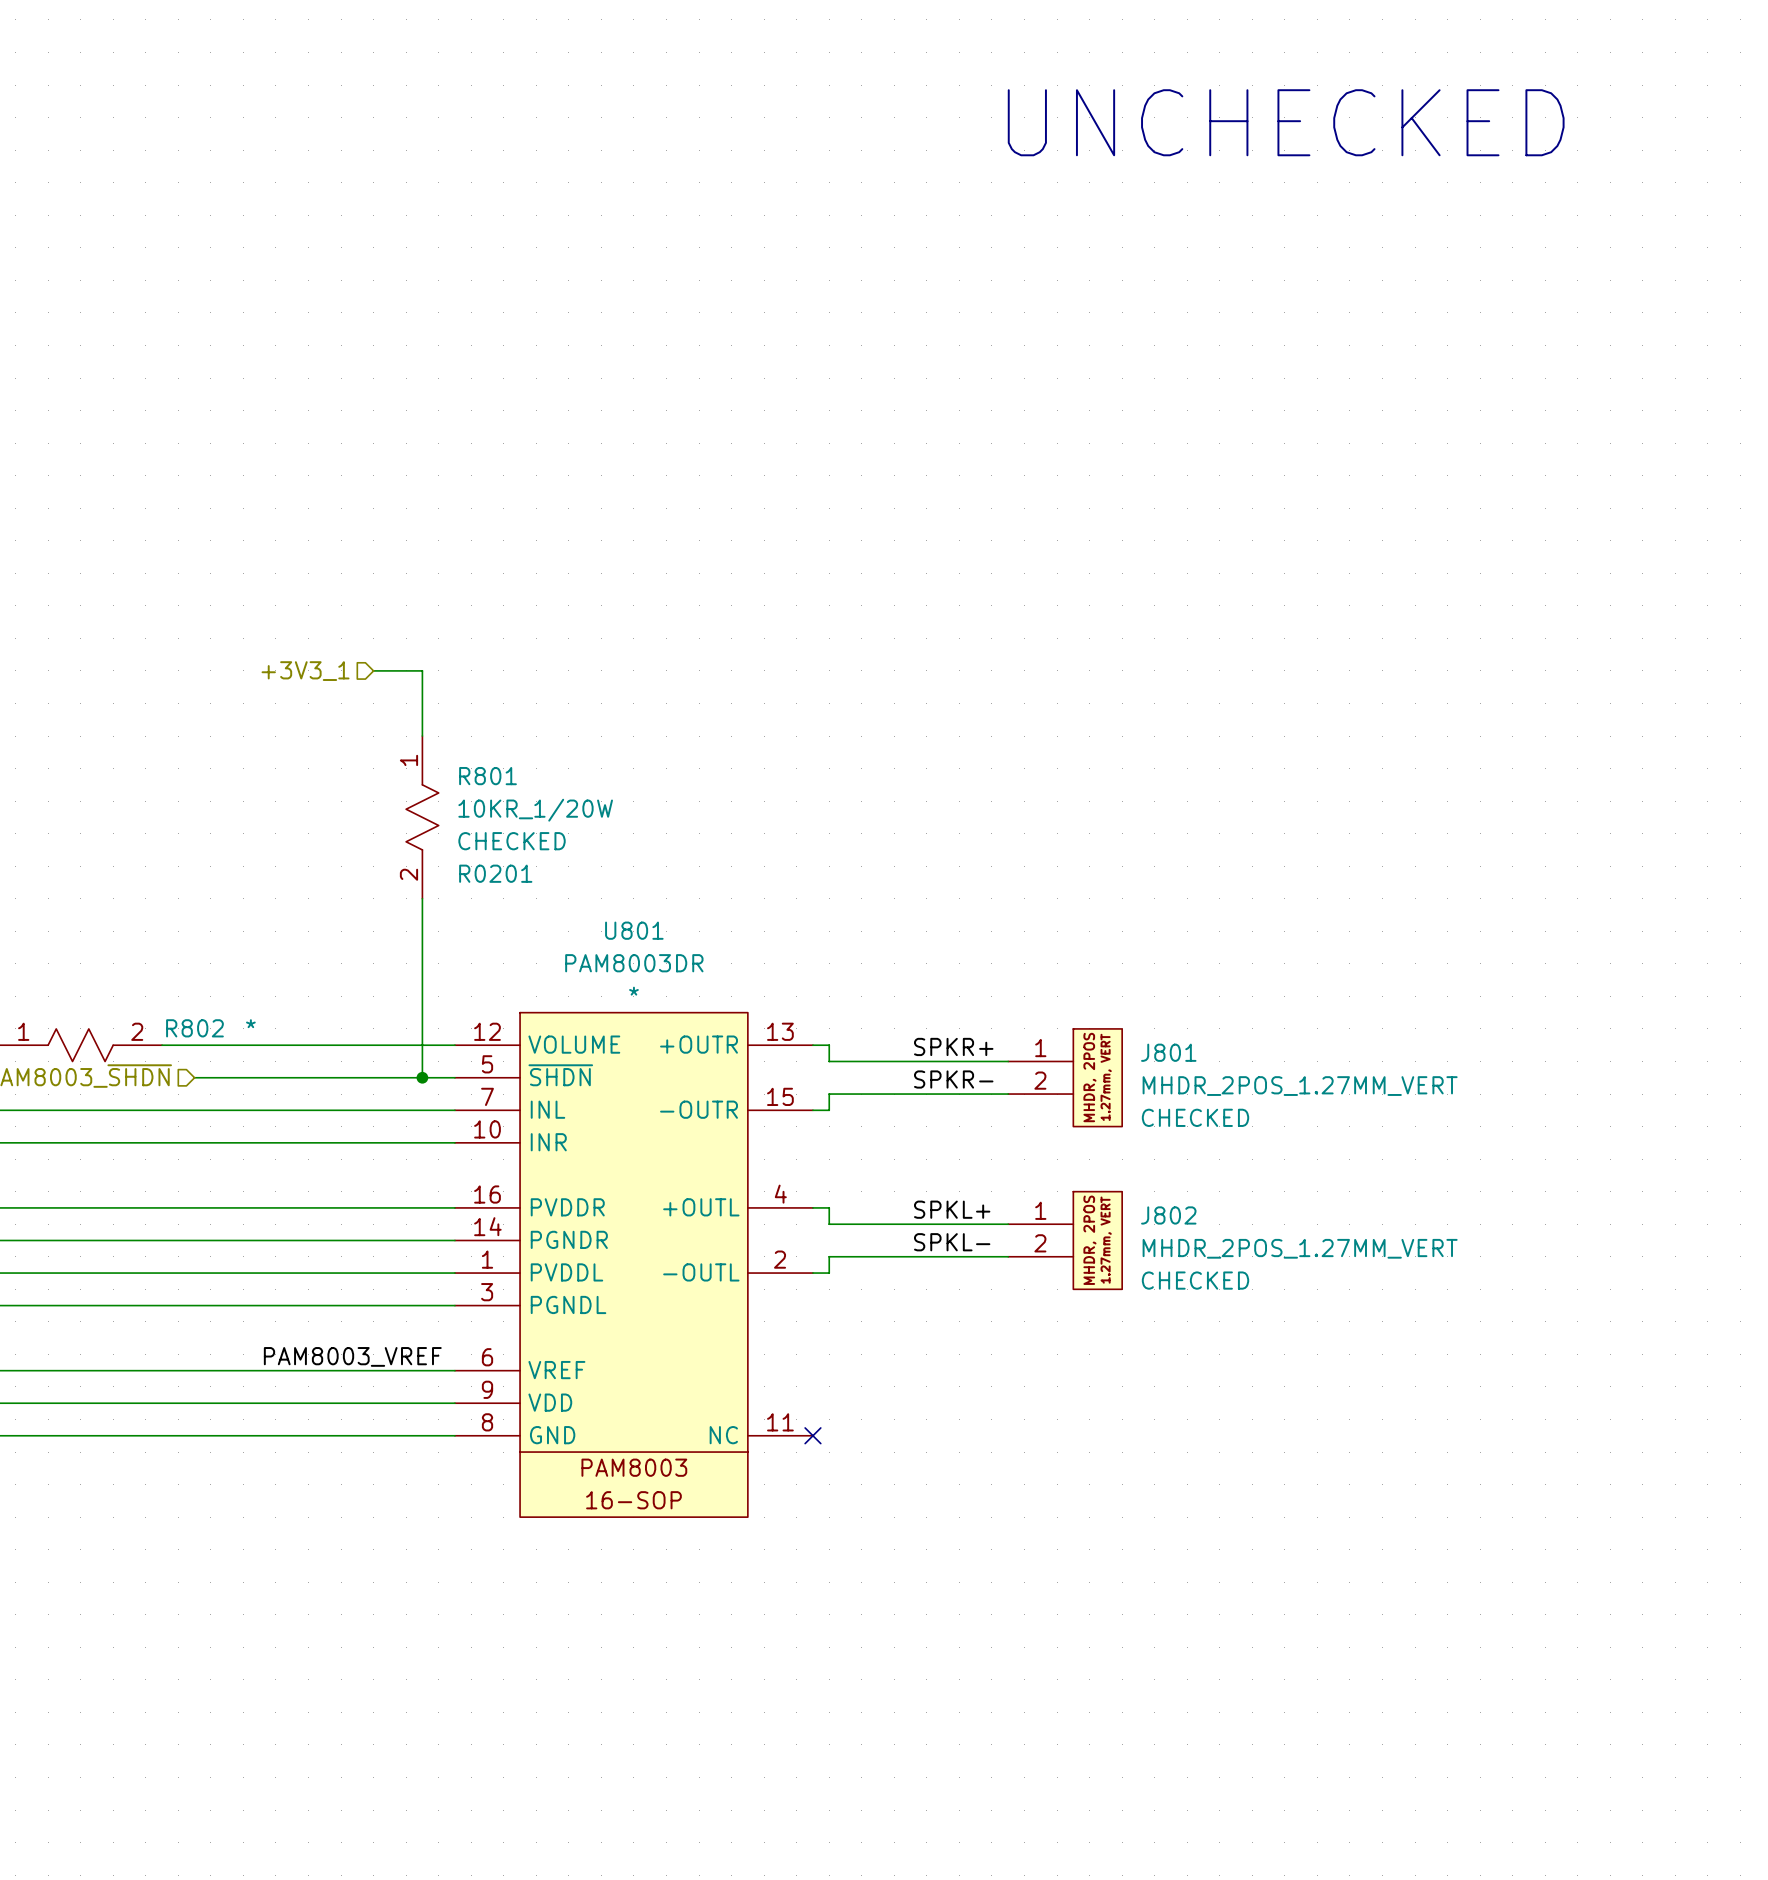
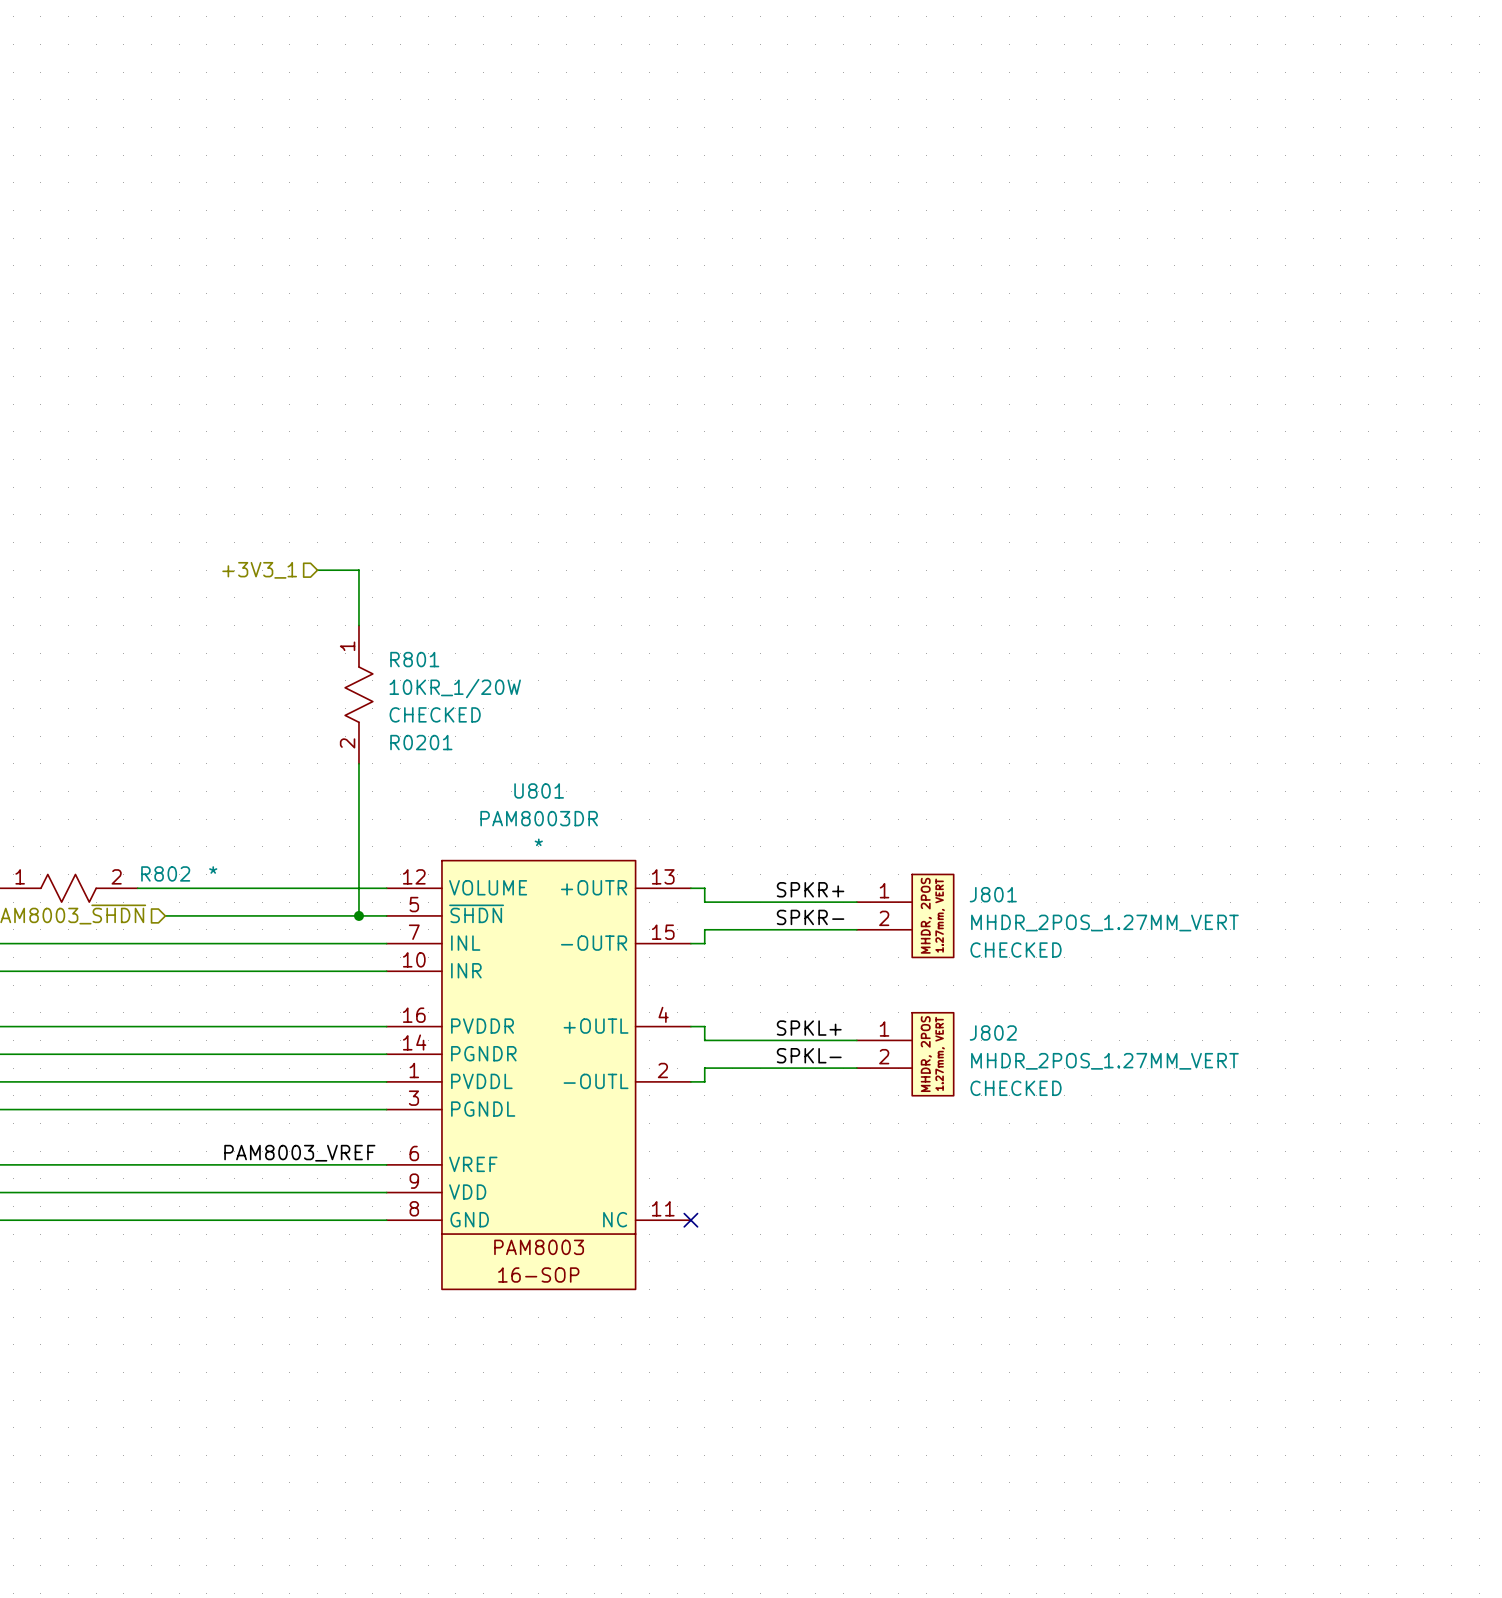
text: UNCHECKED (1286, 122) -> none

